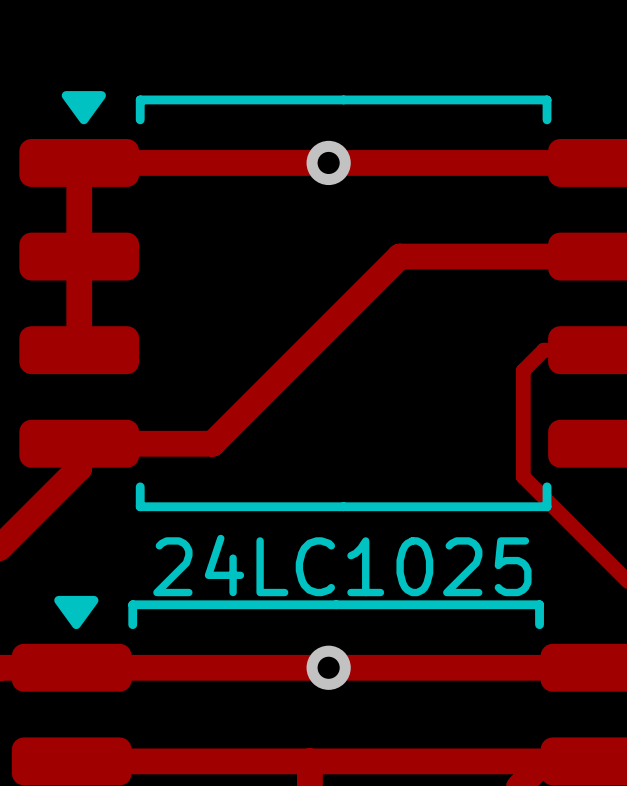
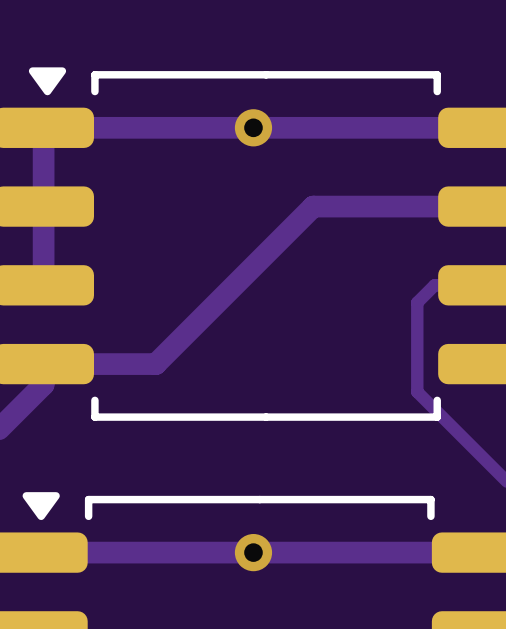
part value: 24LC1025 (342, 565) -> none

